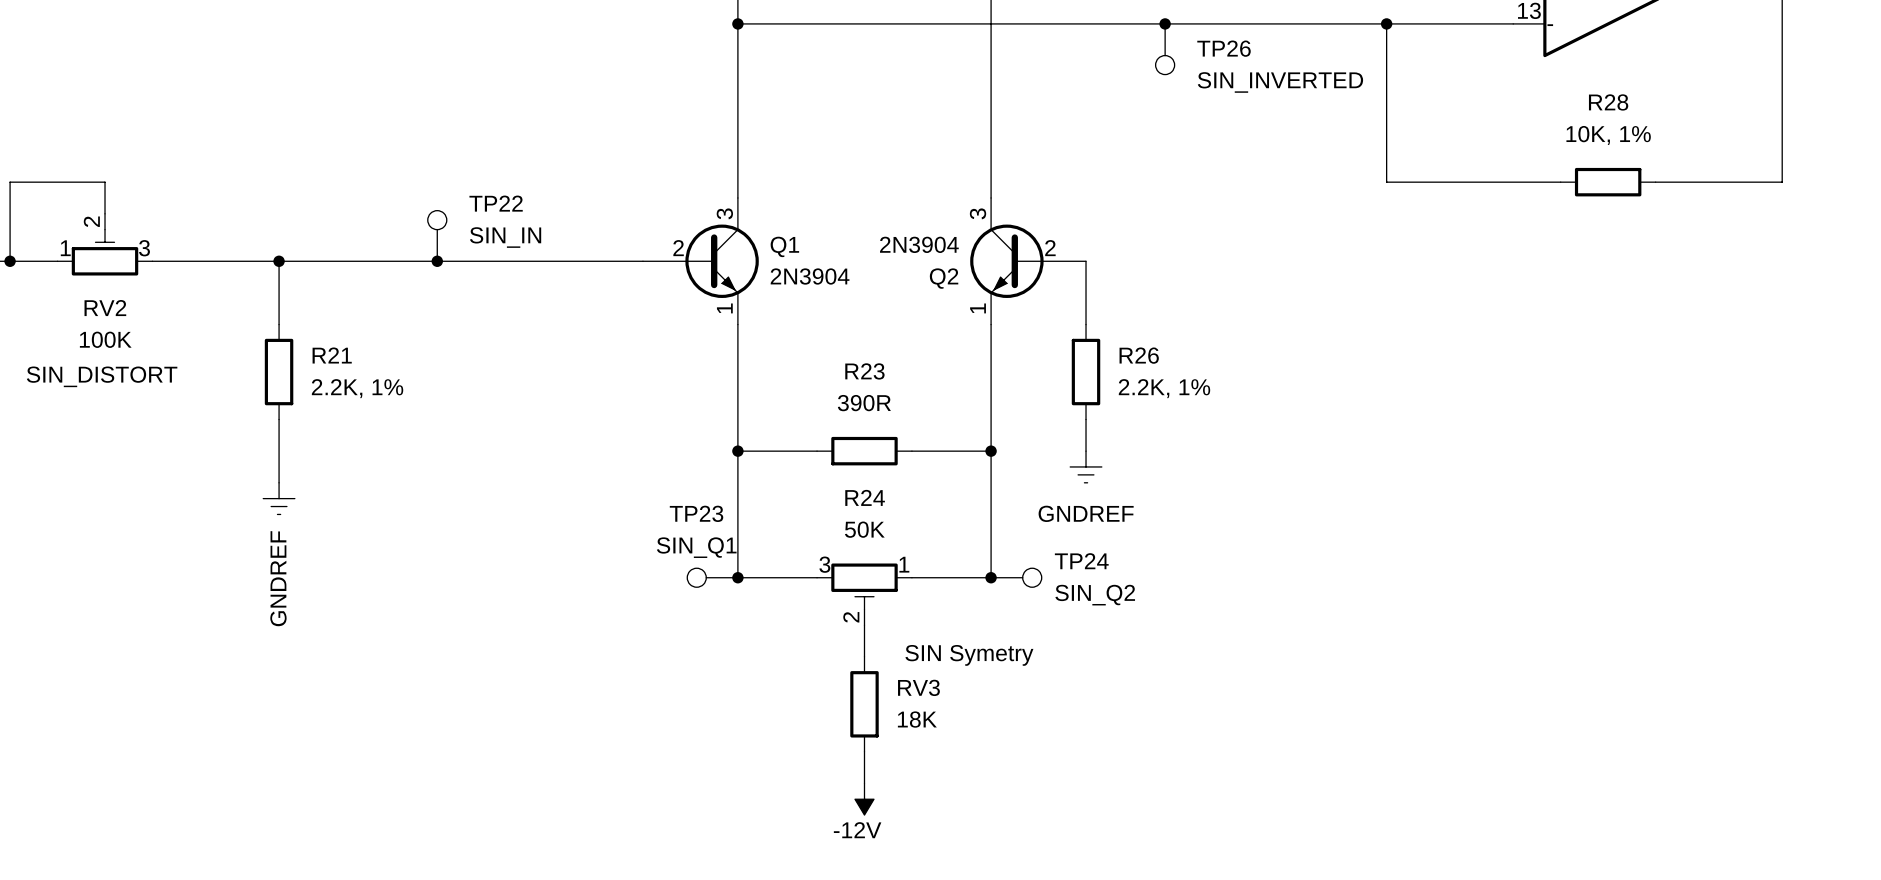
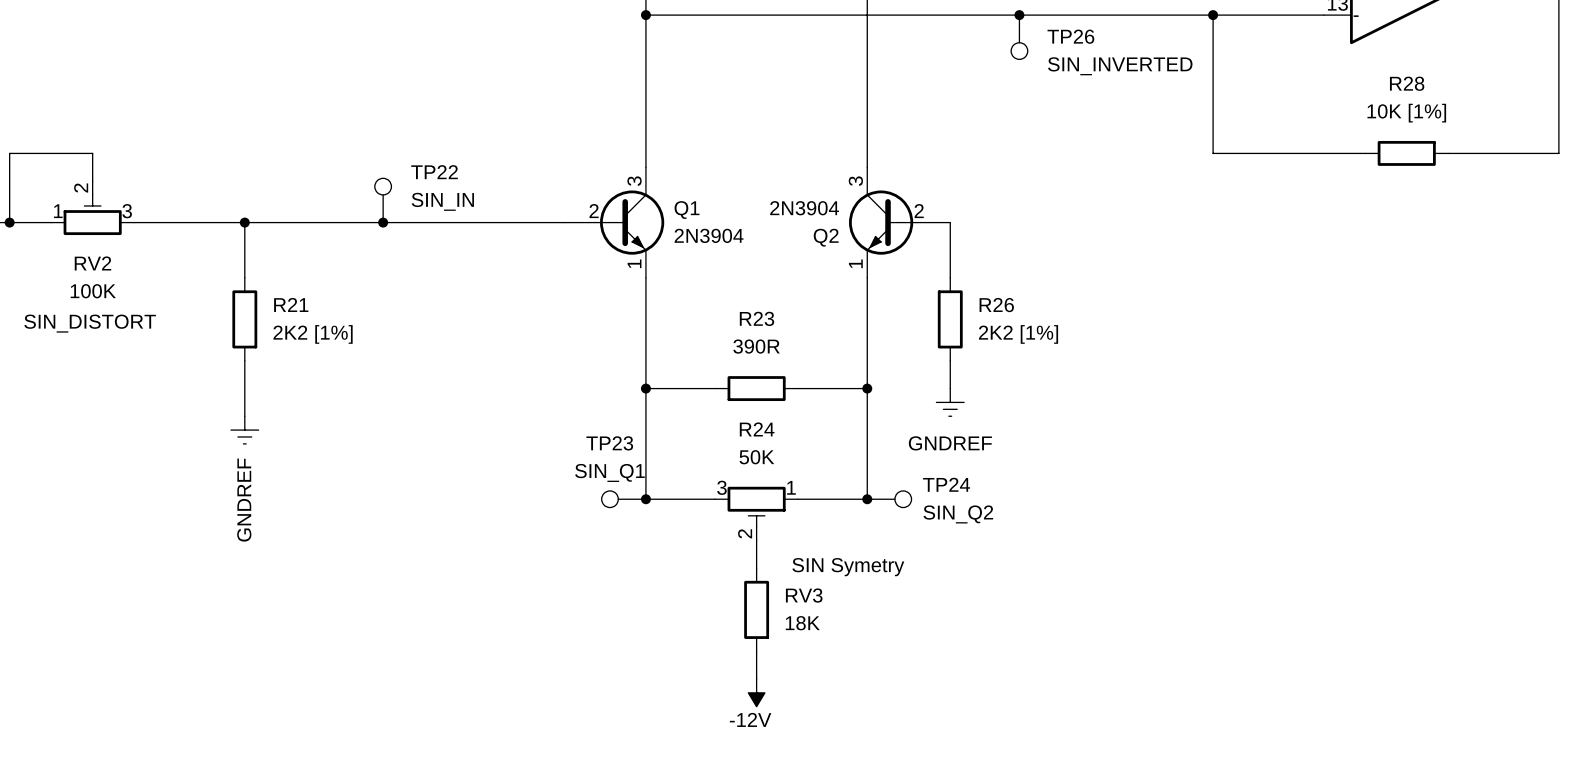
R28 value: 10K, 1% (1608, 135) -> 10K [1%] (1406, 113)
R21 value: 2.2K, 1% (357, 388) -> 2K2 [1%] (313, 334)
R26 value: 2.2K, 1% (1164, 388) -> 2K2 [1%] (1018, 334)

